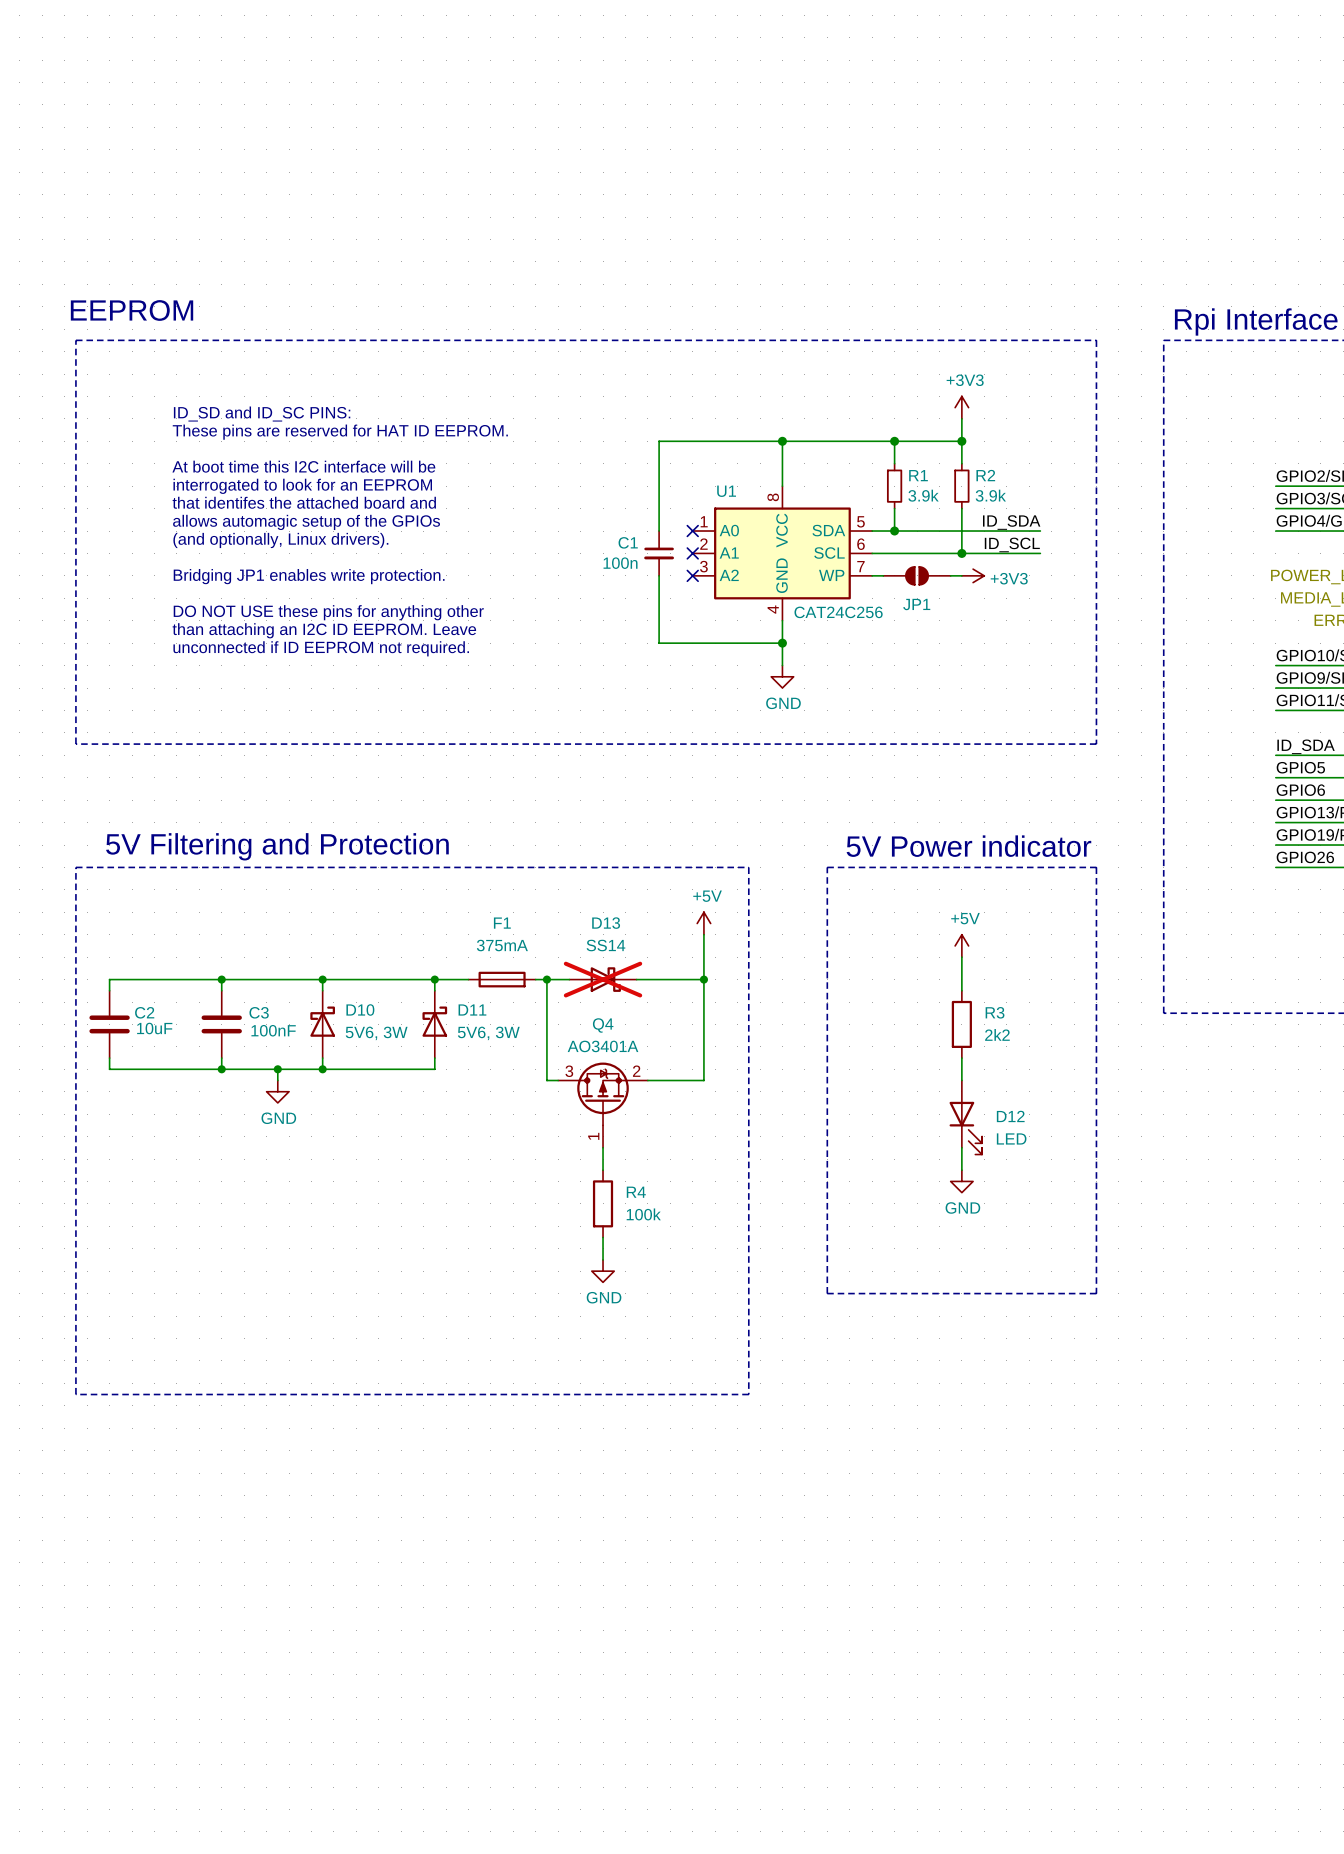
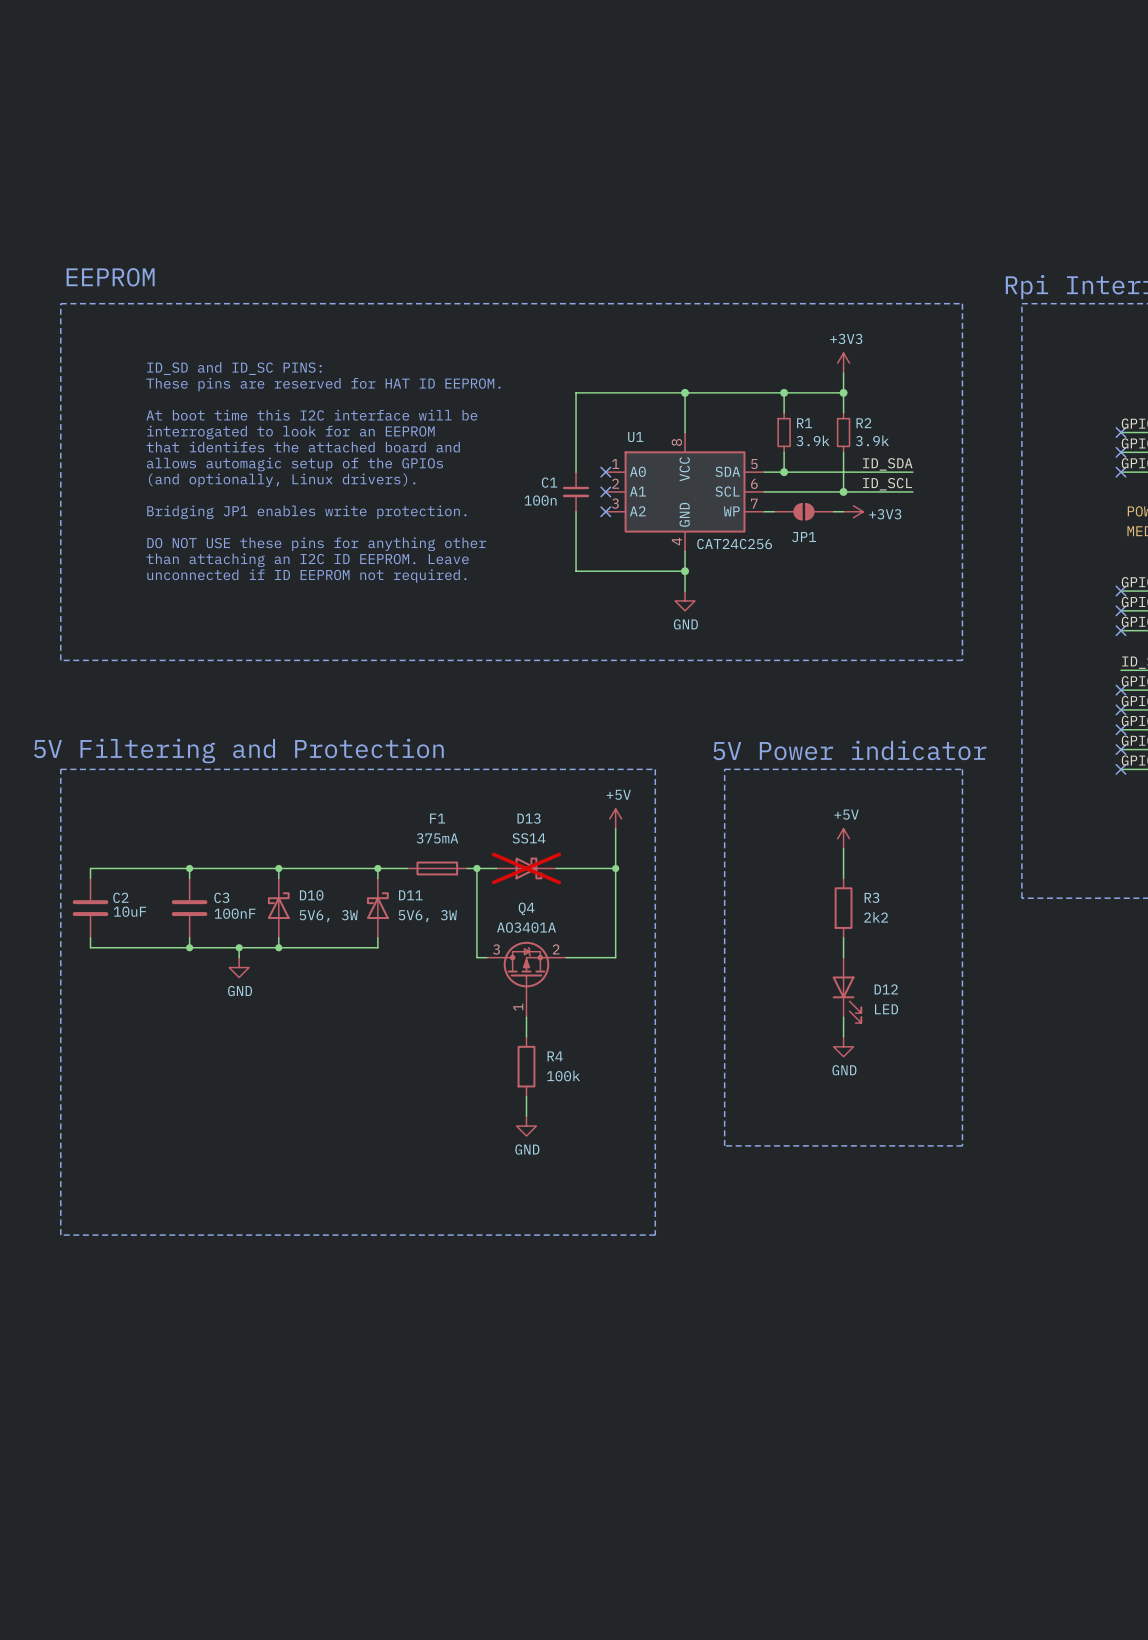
no-connect mark: none -> (1121, 432)
no-connect mark: none -> (1121, 452)
no-connect mark: none -> (1121, 472)
no-connect mark: none -> (1121, 591)
no-connect mark: none -> (1121, 610)
no-connect mark: none -> (1121, 630)
no-connect mark: none -> (1121, 690)
no-connect mark: none -> (1121, 709)
no-connect mark: none -> (1121, 729)
no-connect mark: none -> (1121, 749)
no-connect mark: none -> (1121, 769)

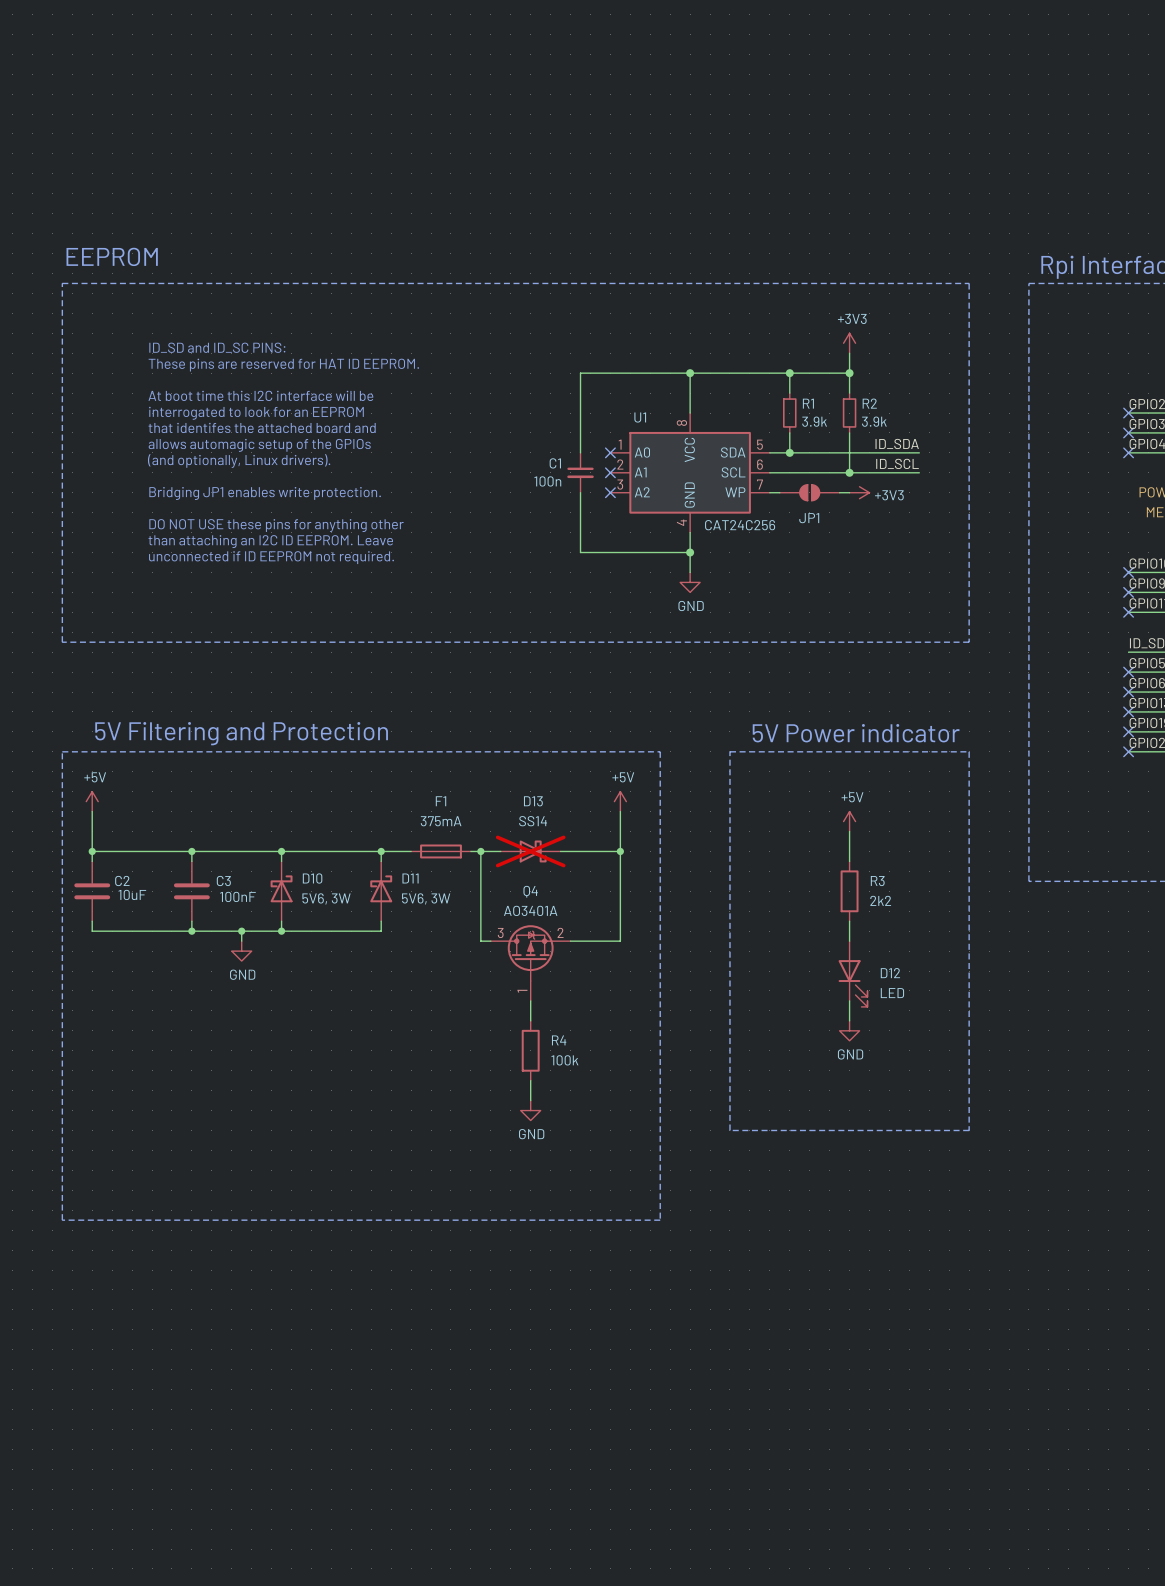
power symbol: none -> +5V (92, 801)
wire: none -> (92, 811) (92, 851)
junction: none -> (92, 851)

